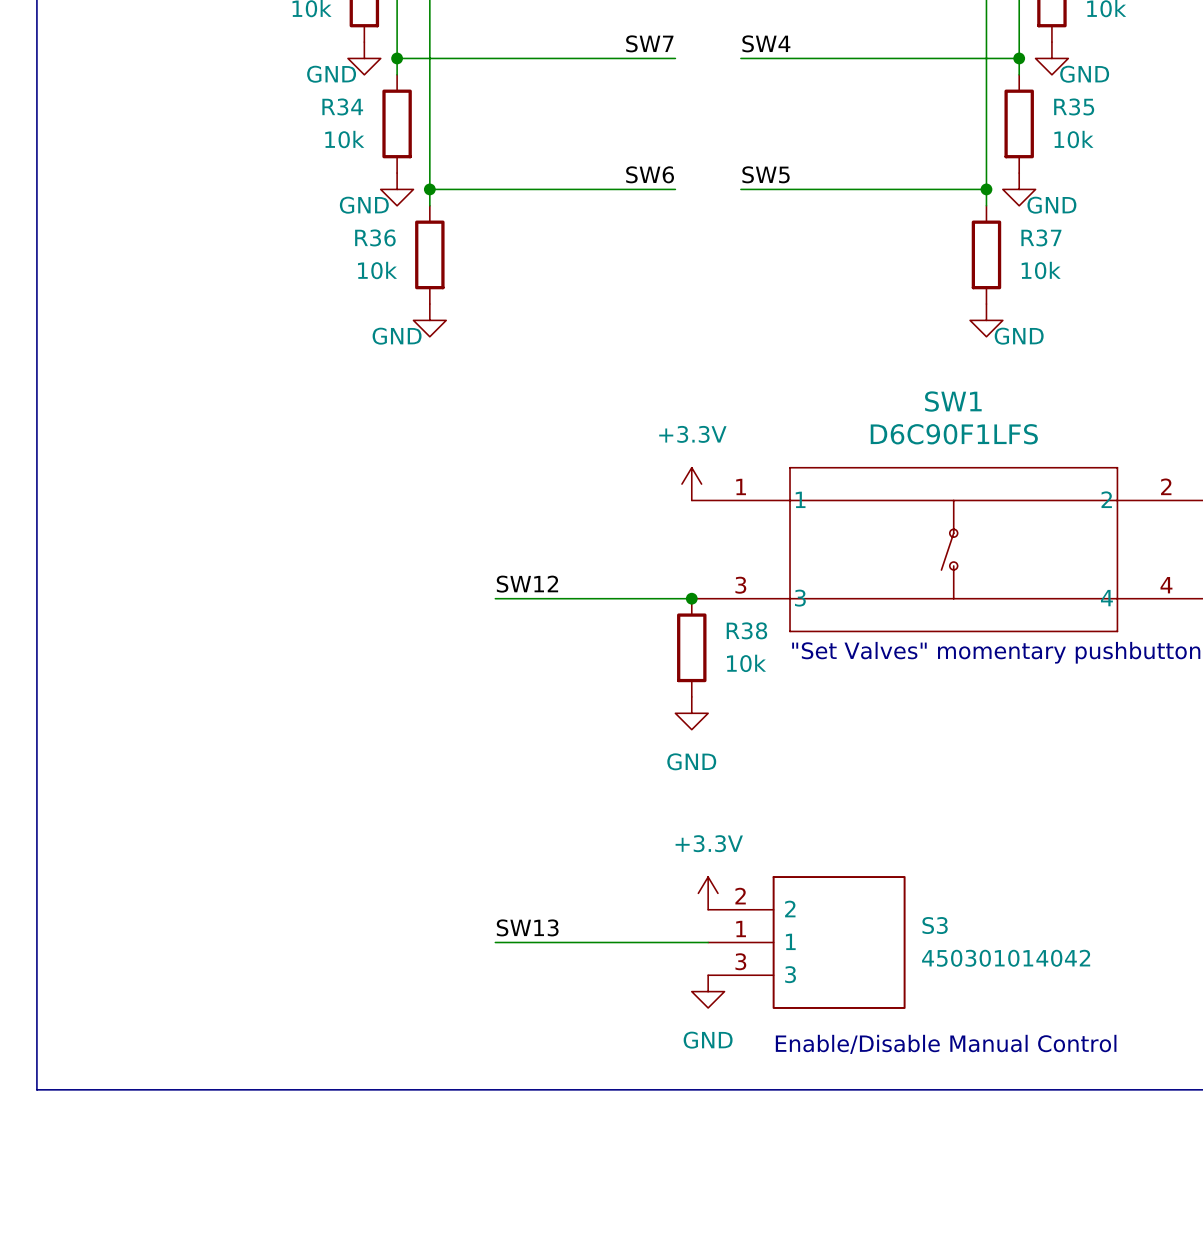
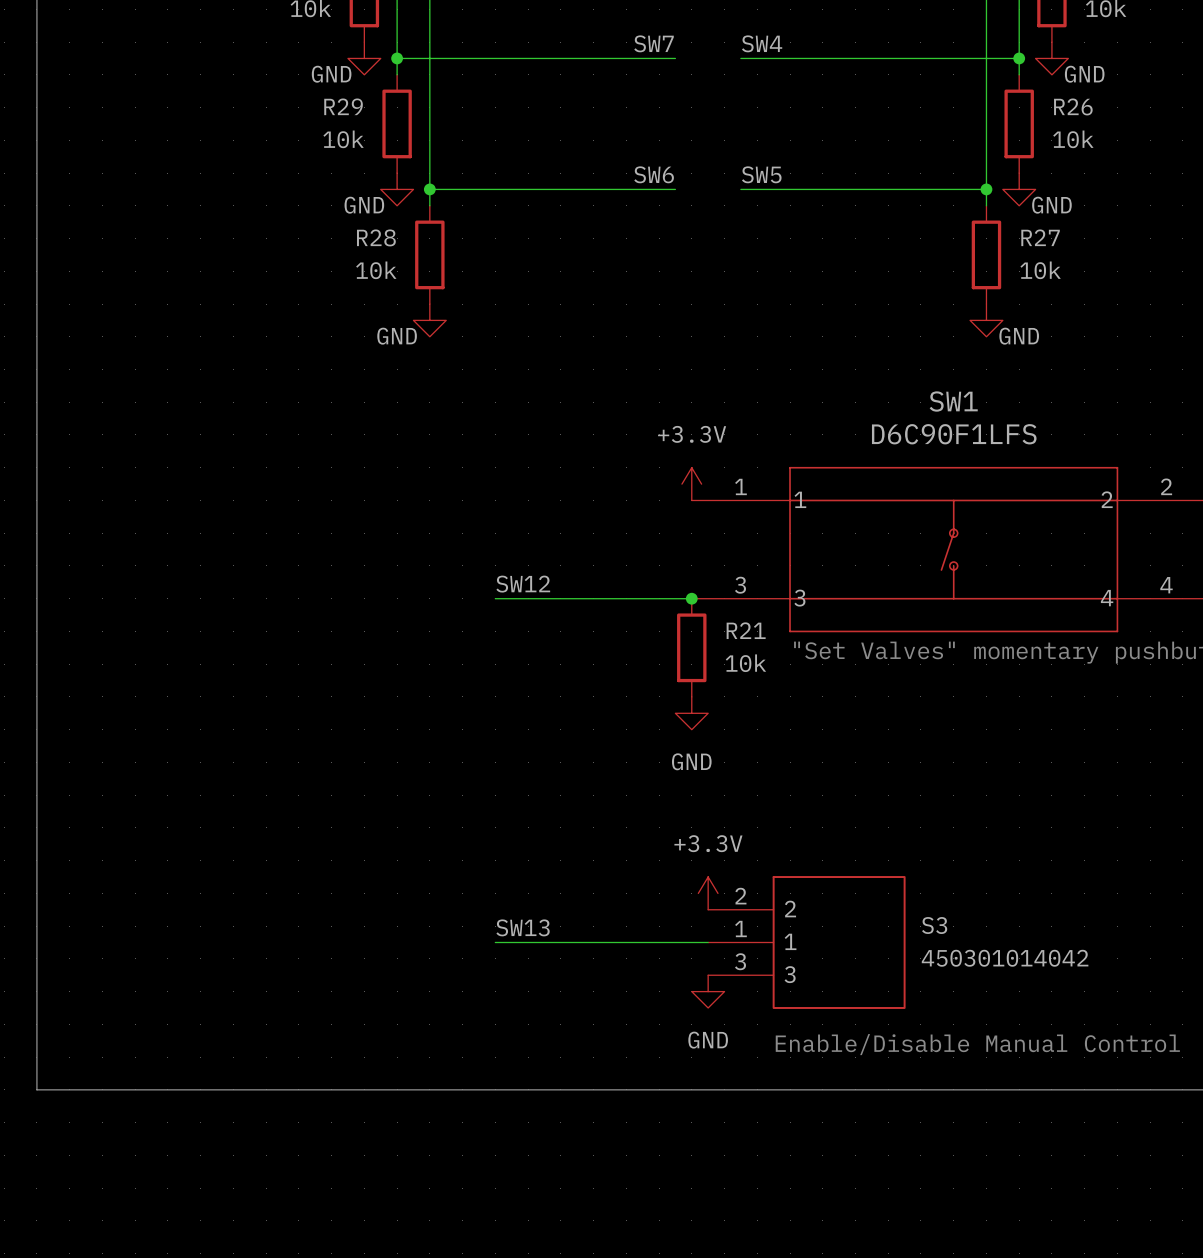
R34 name: R34 (342, 106) -> R29 (343, 106)
R35 name: R35 (1074, 106) -> R26 (1073, 106)
R36 name: R36 (375, 237) -> R28 (376, 237)
R37 name: R37 (1041, 237) -> R27 (1040, 237)
R38 name: R38 (746, 630) -> R21 (746, 630)

